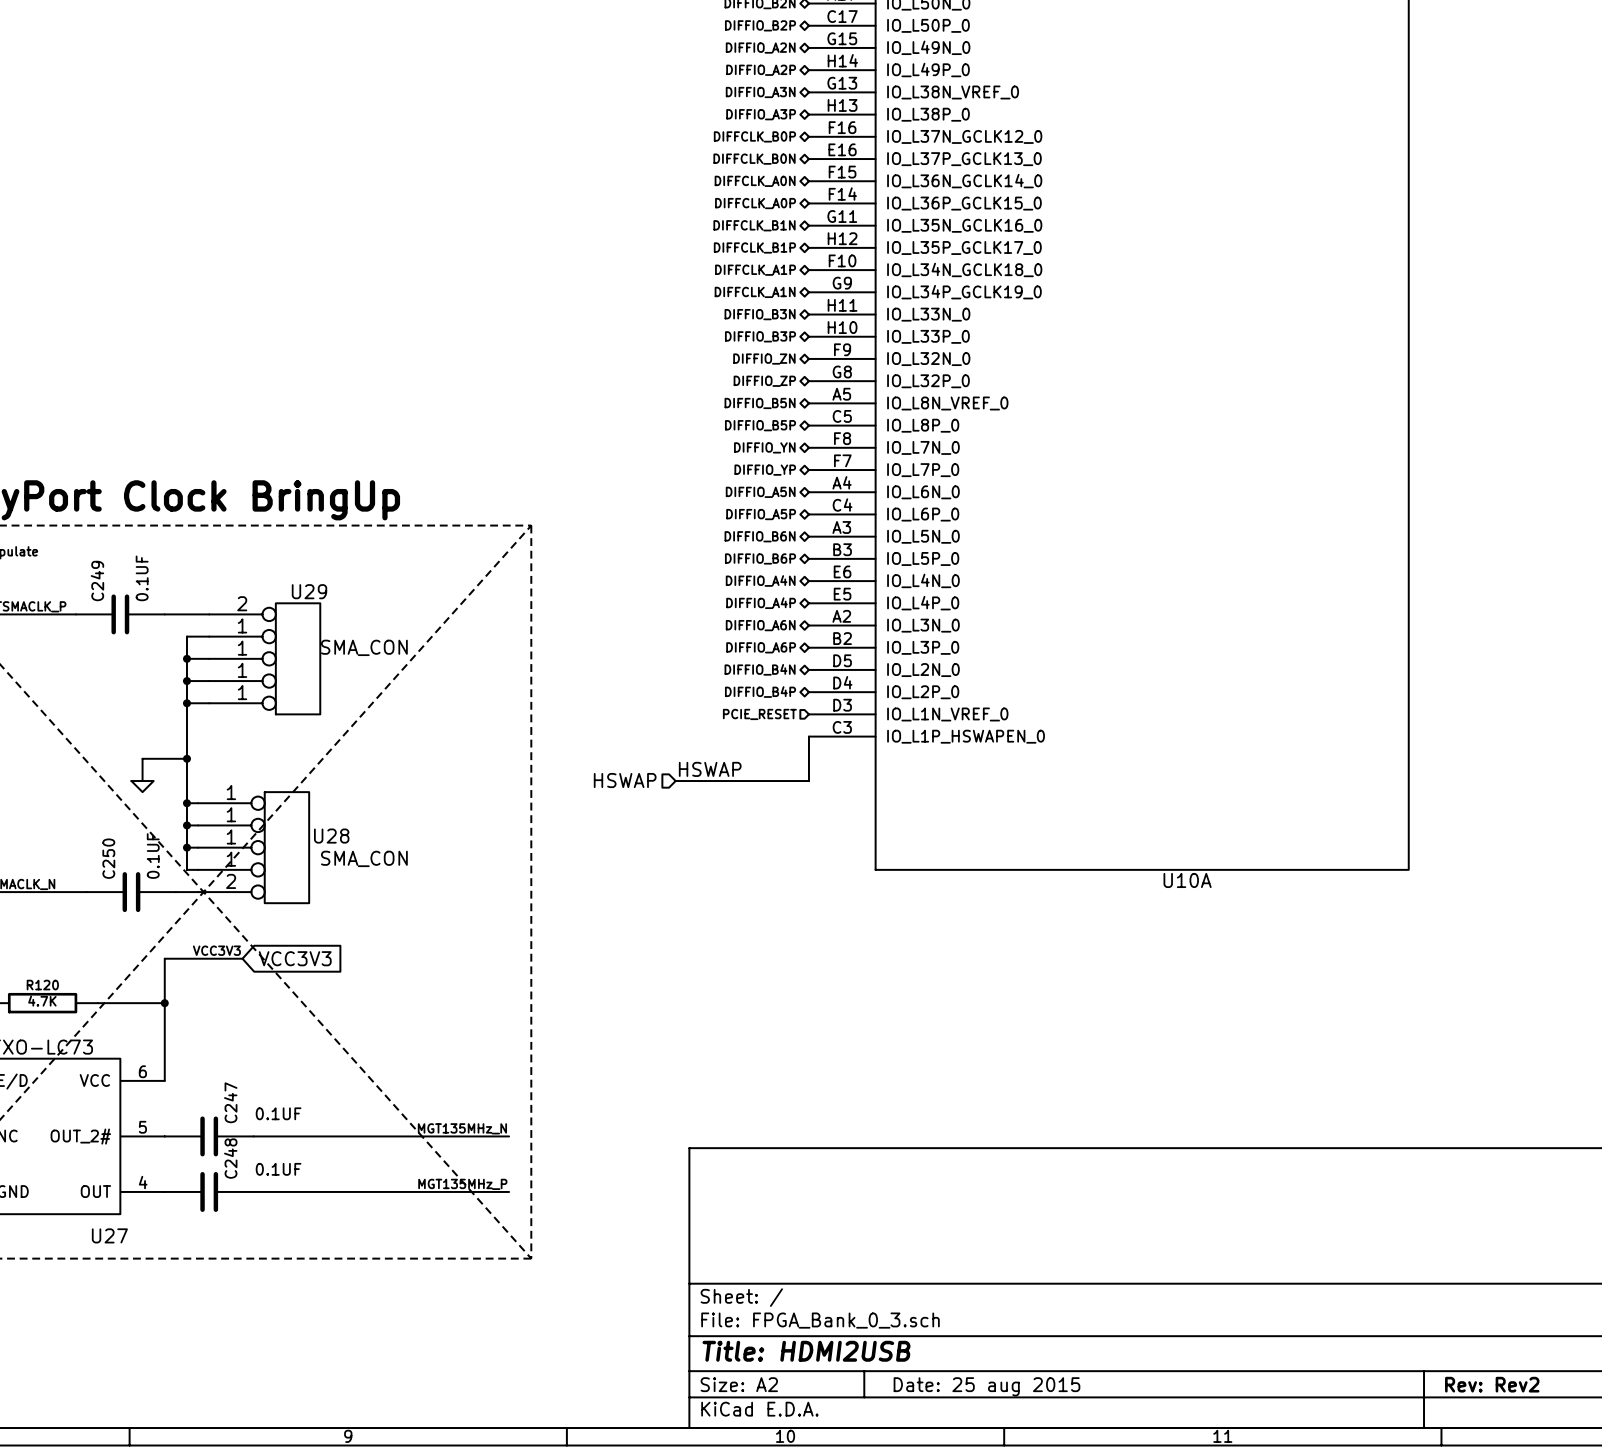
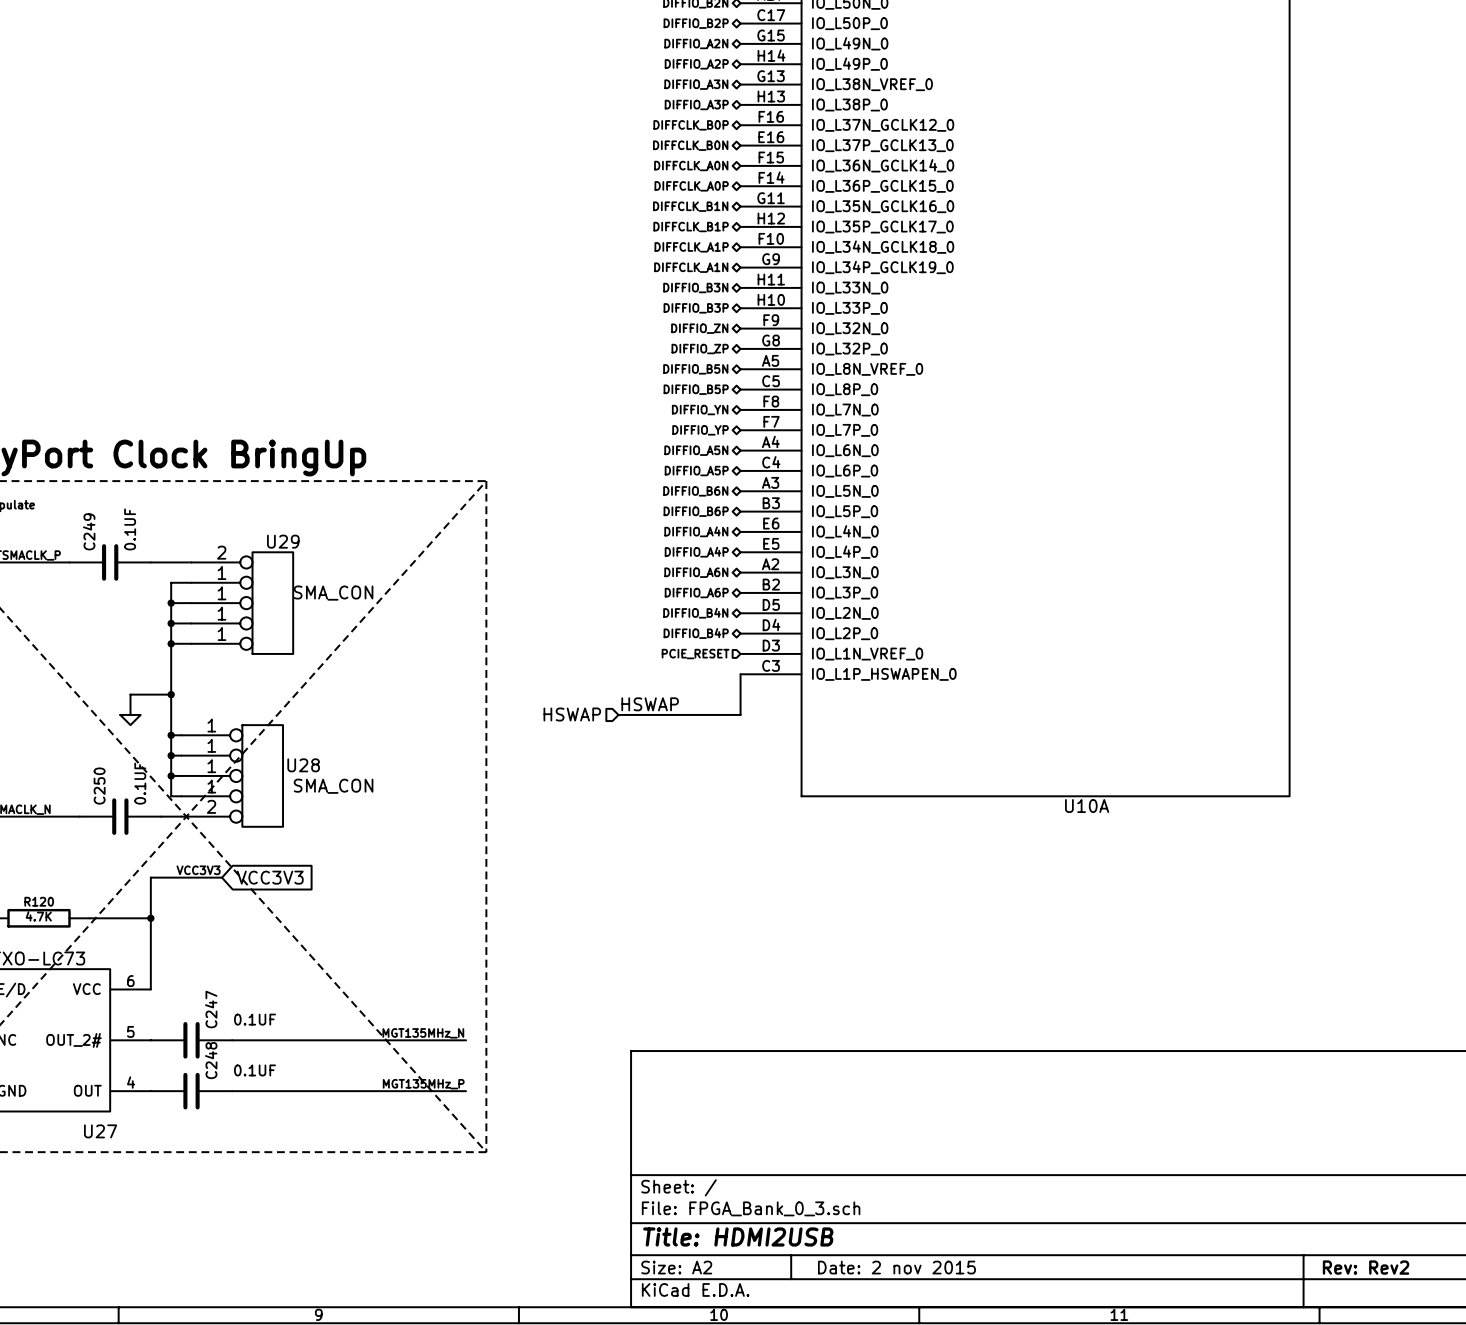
title block: Date: 25 aug 2015 (986, 1386) -> Date: 2 nov 2015 (896, 1267)

